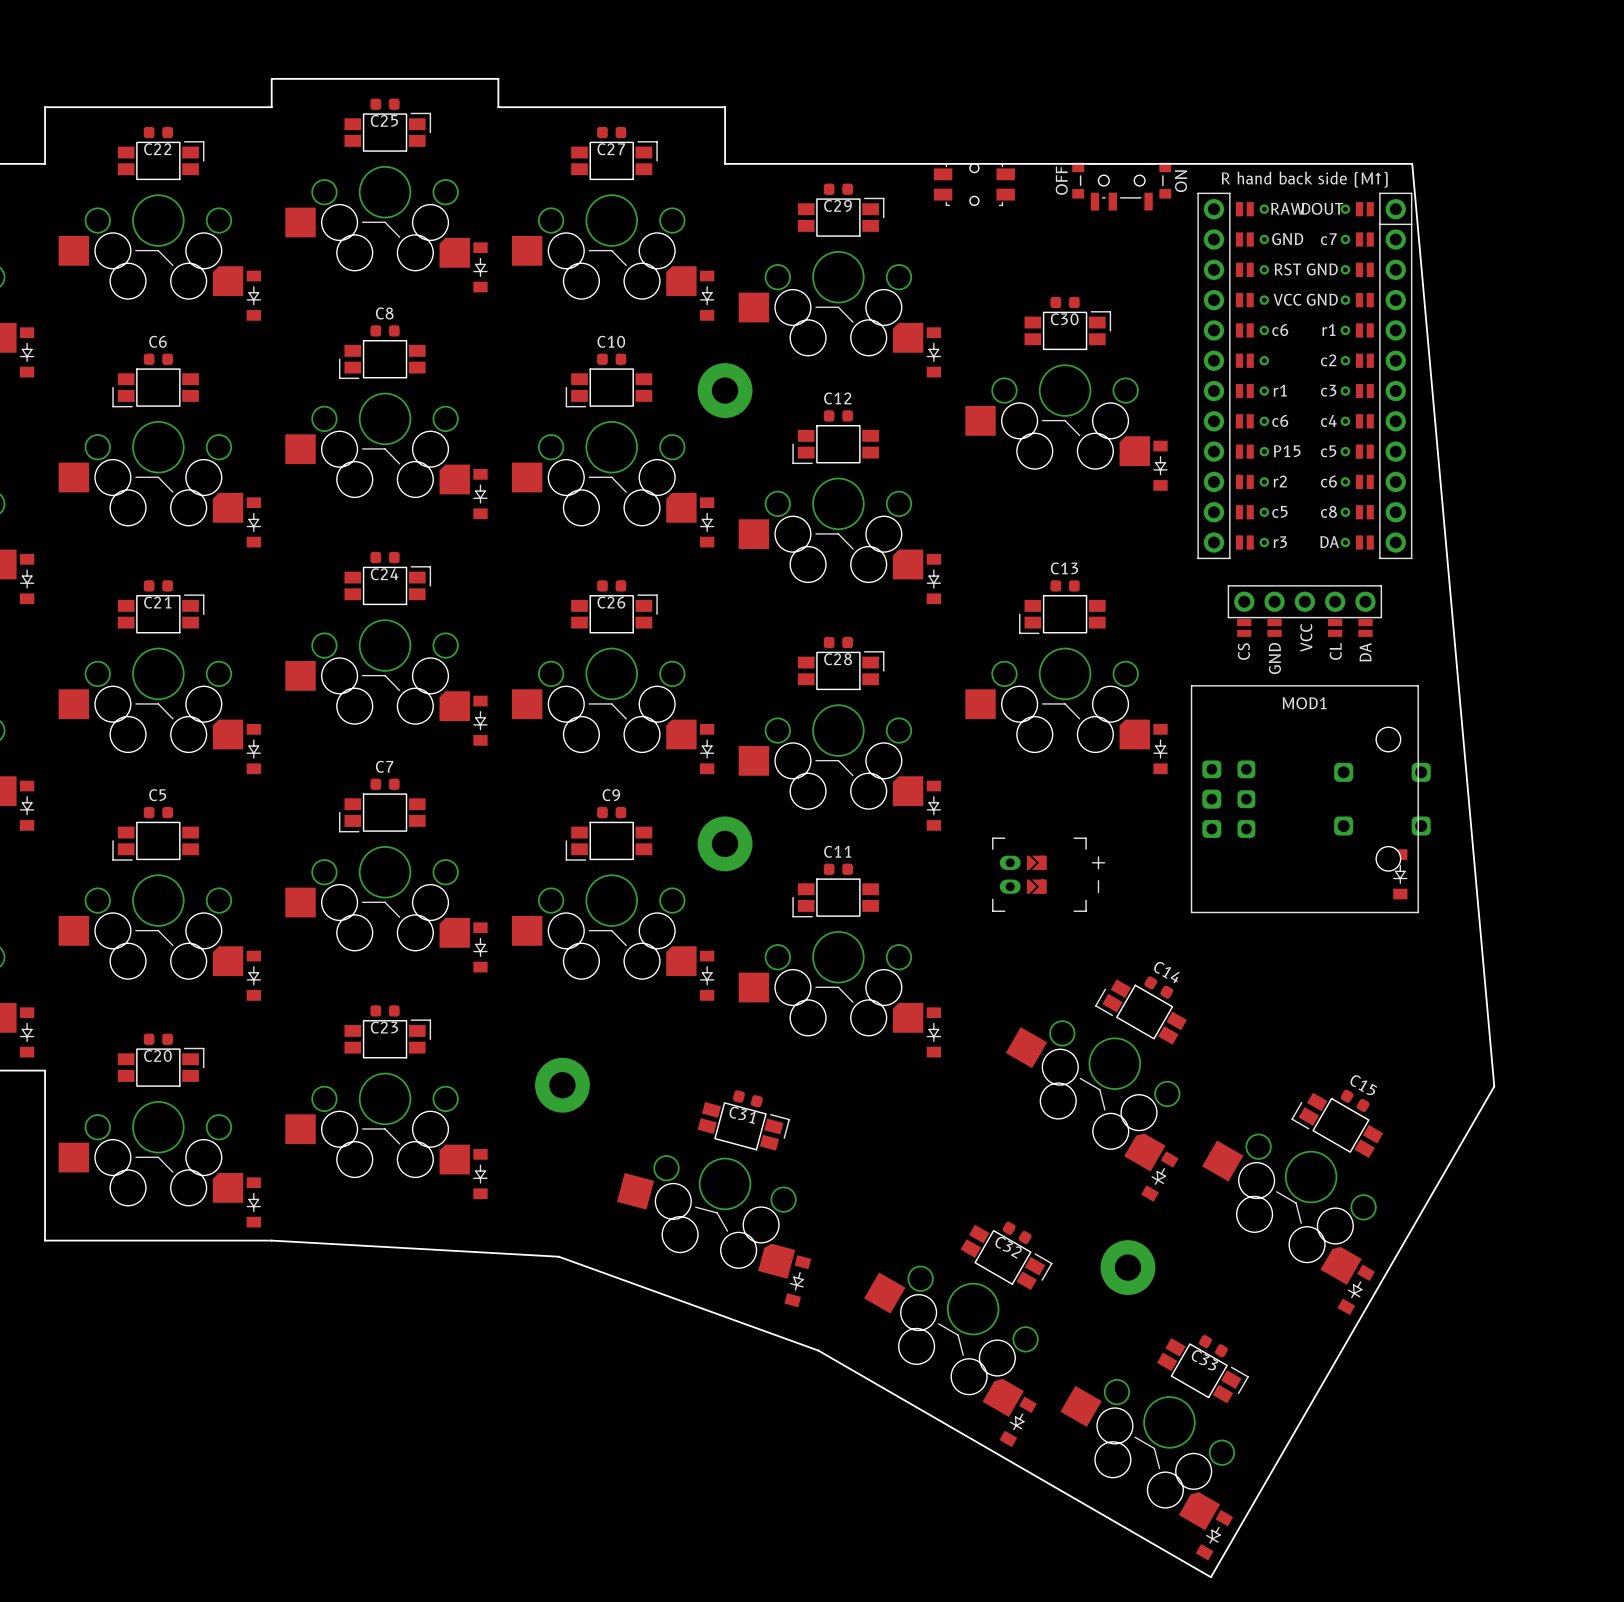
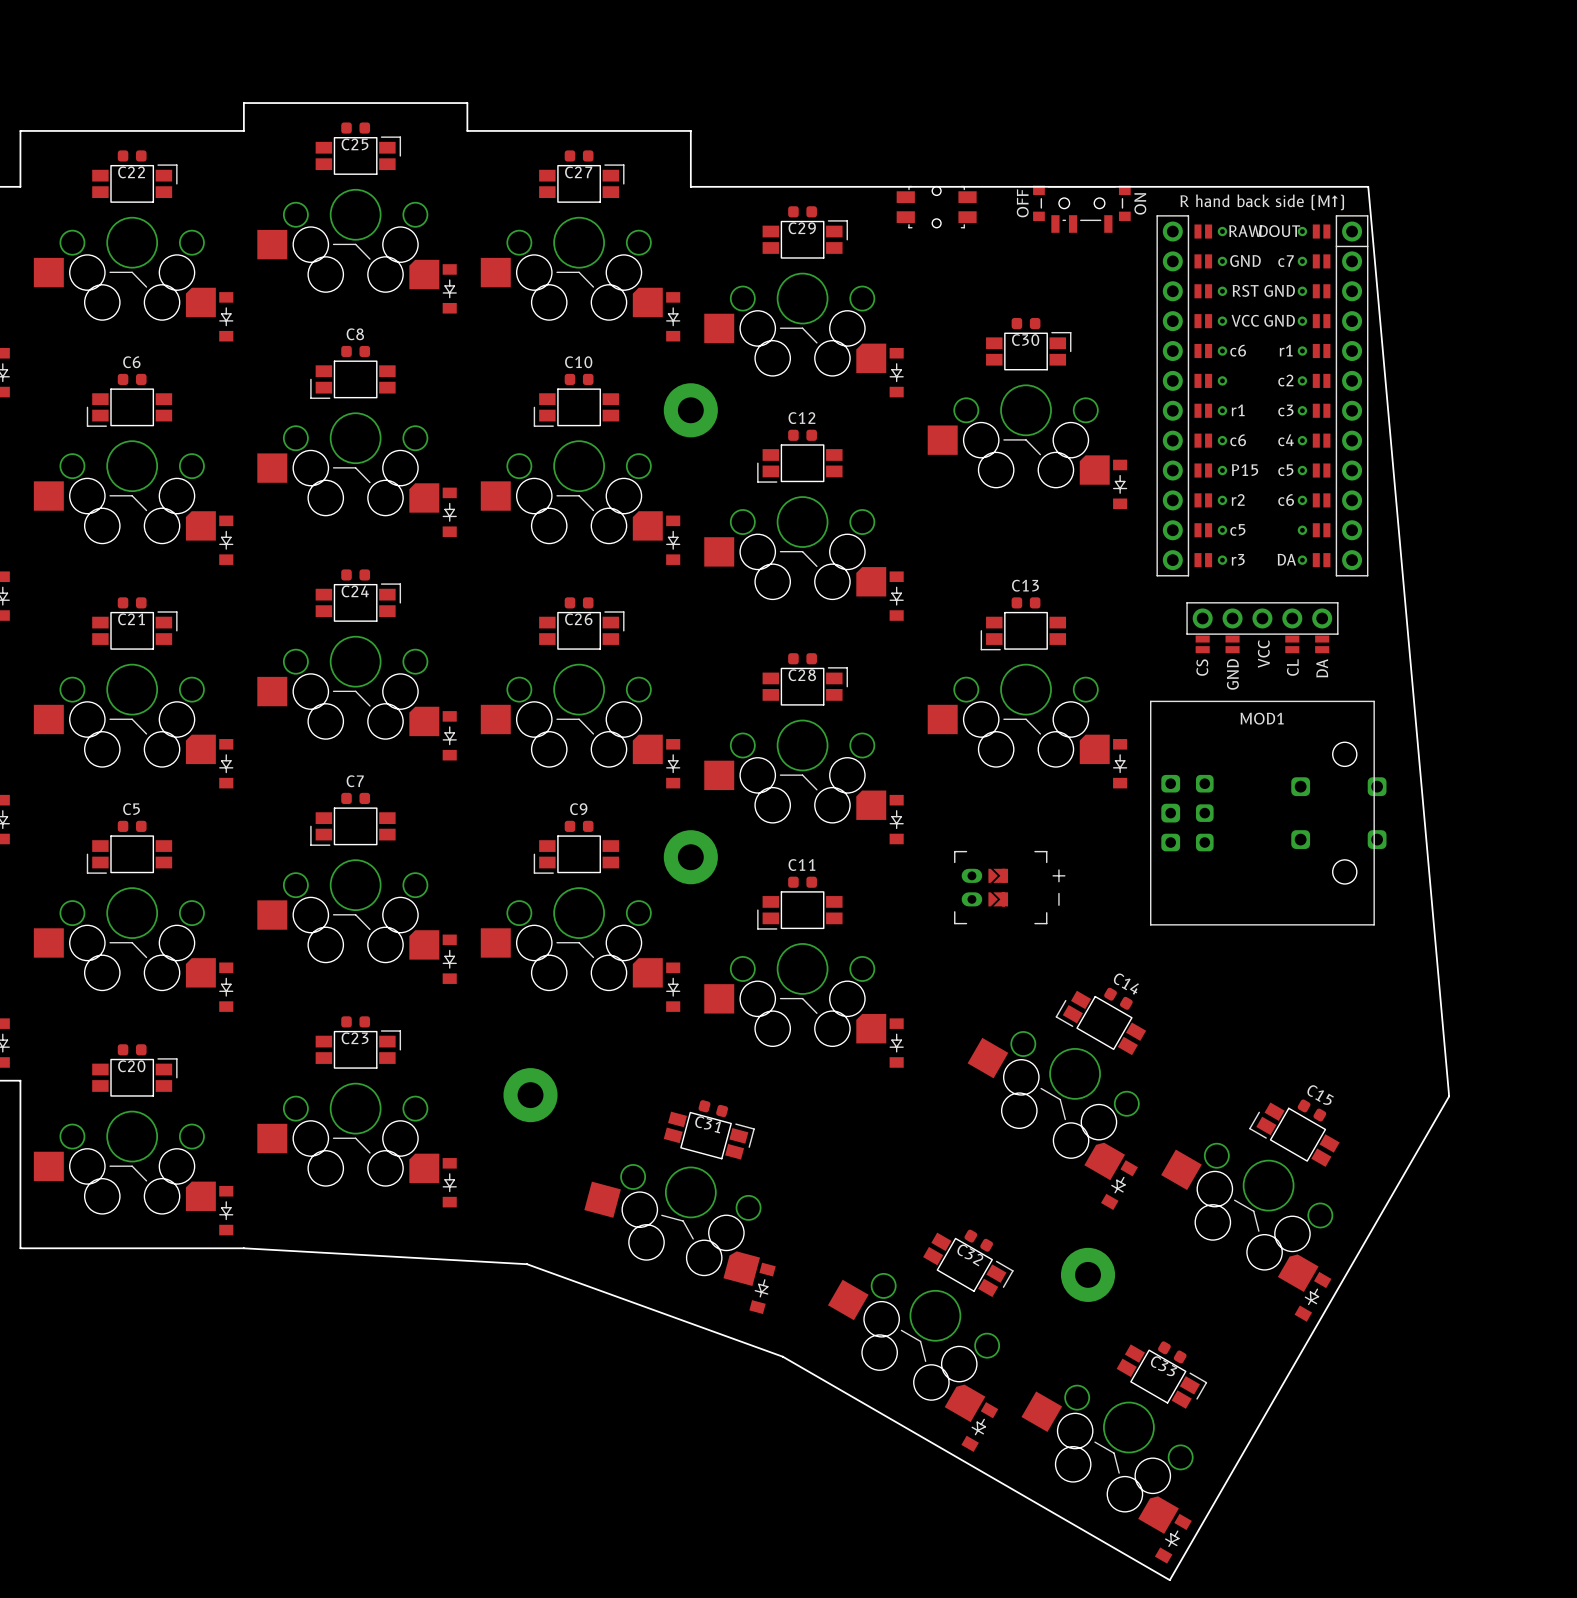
part text: c8 (1328, 511) -> none
part: (1400, 874) -> none

